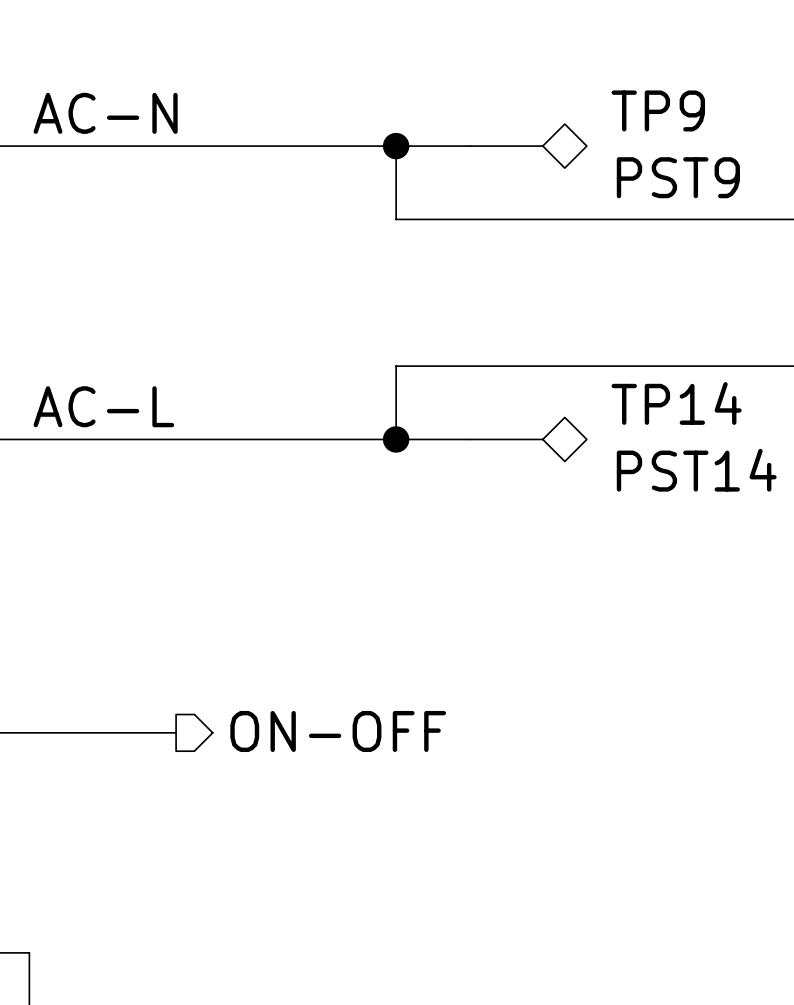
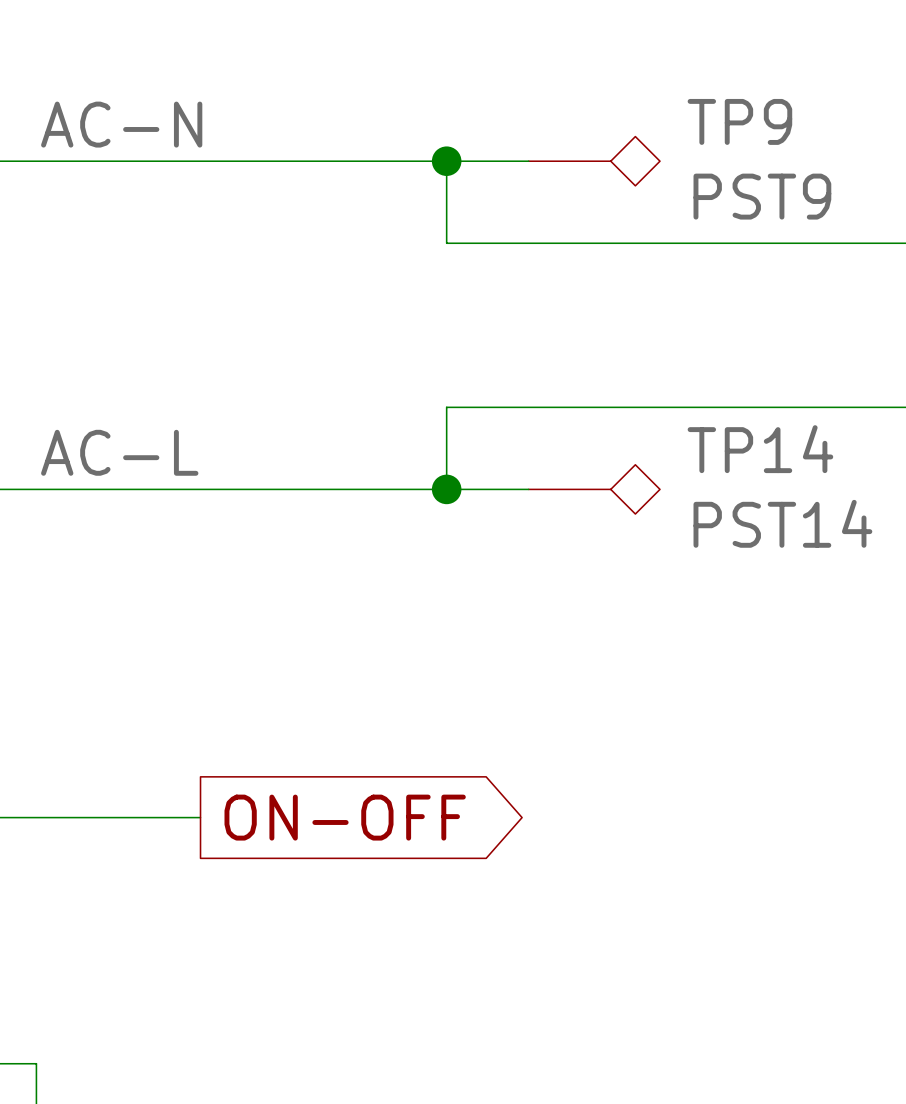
hierarchical label: ON-OFF (338, 731) -> none
global label: none -> ON-OFF (345, 817)

